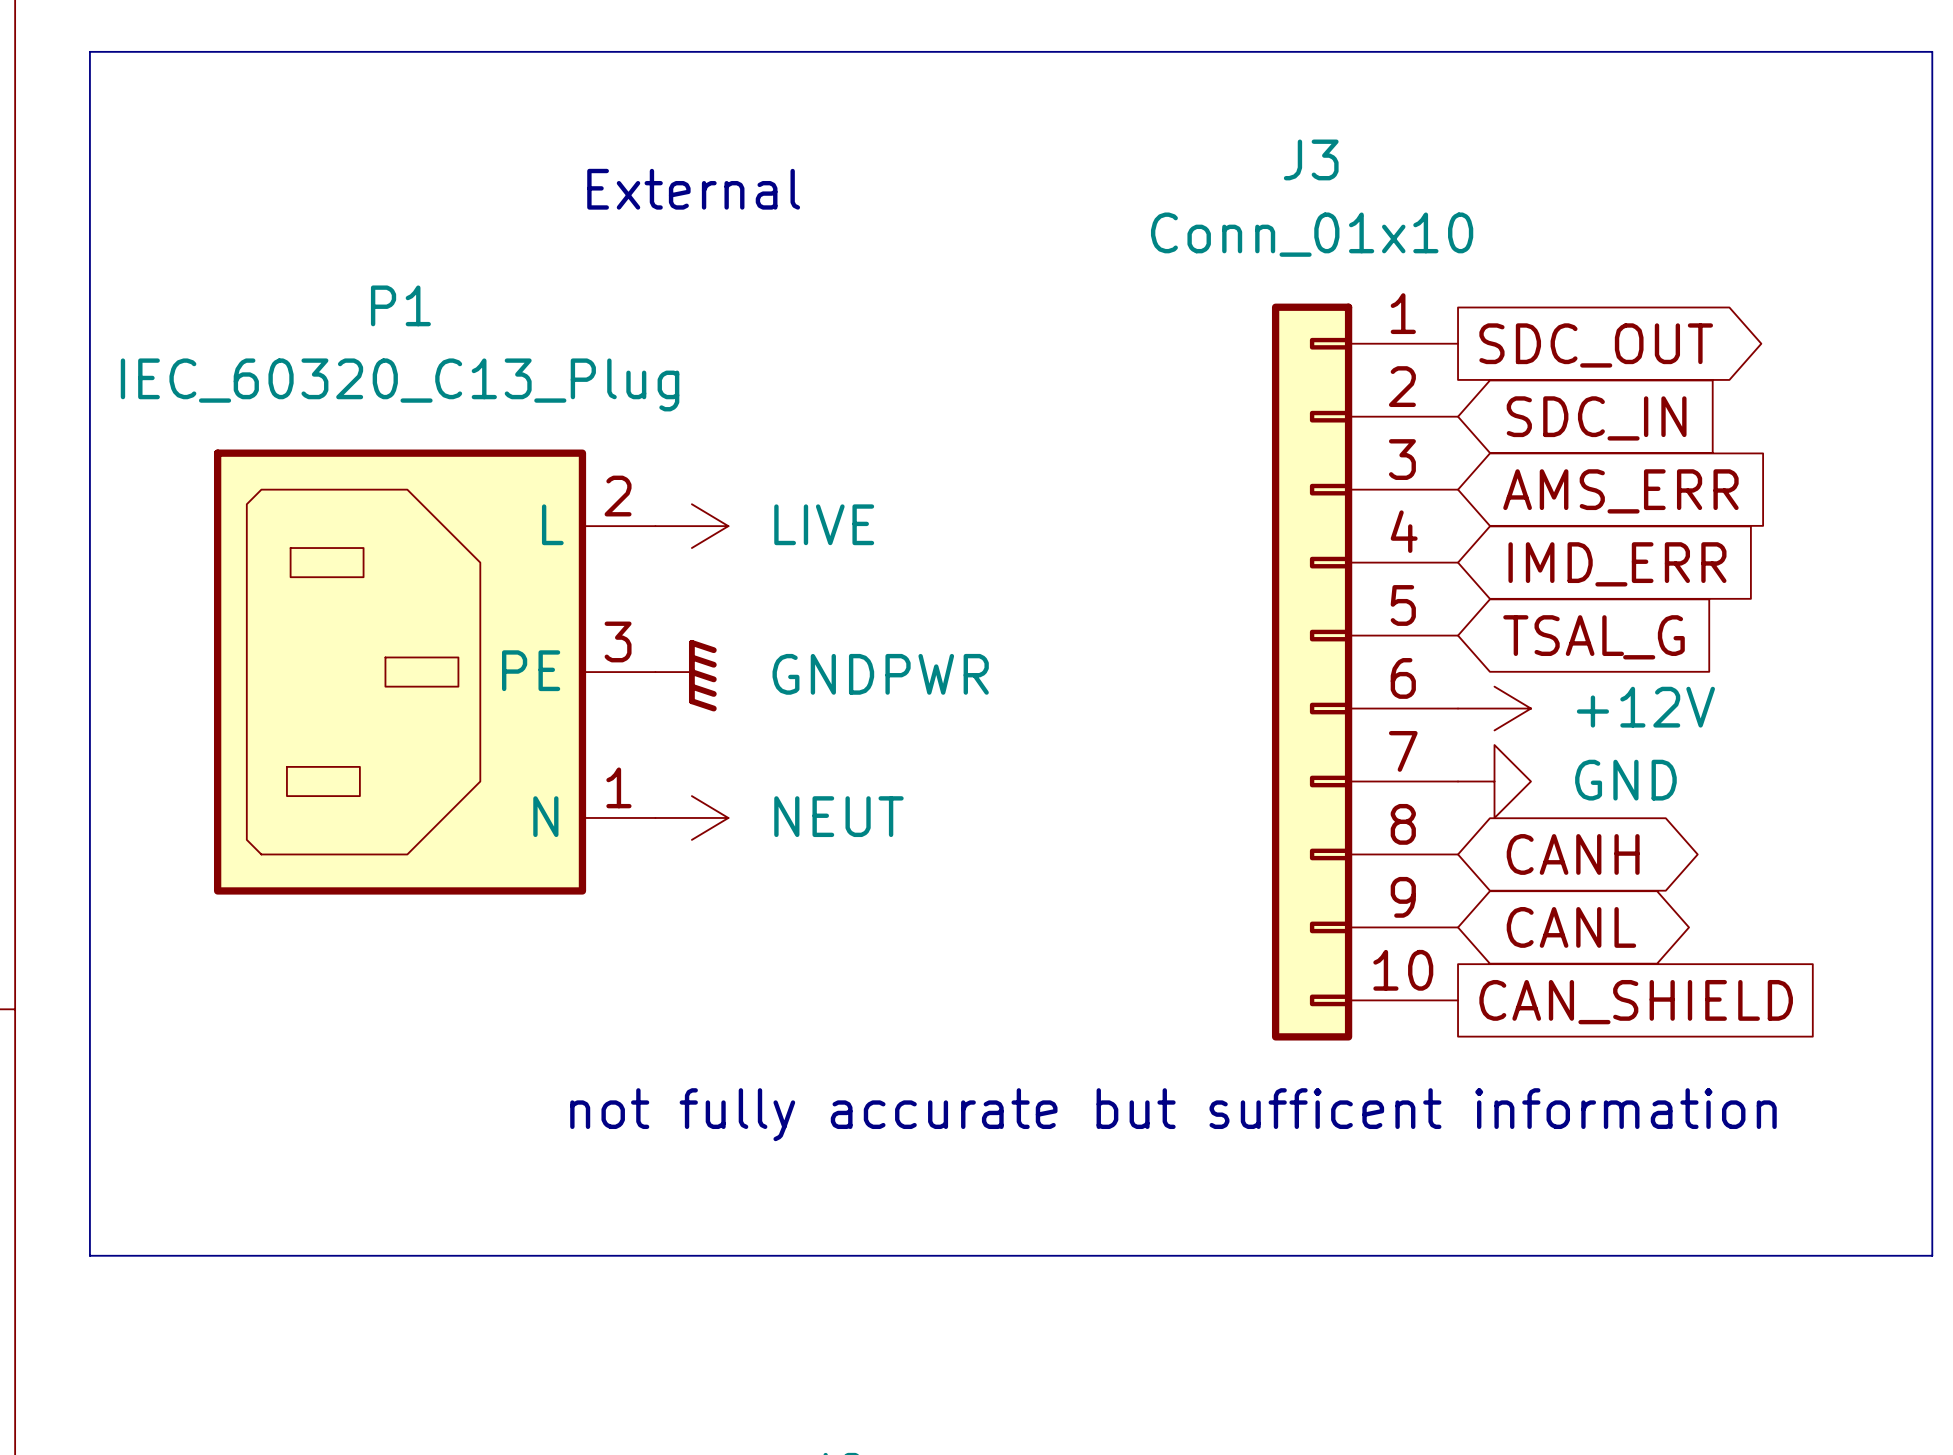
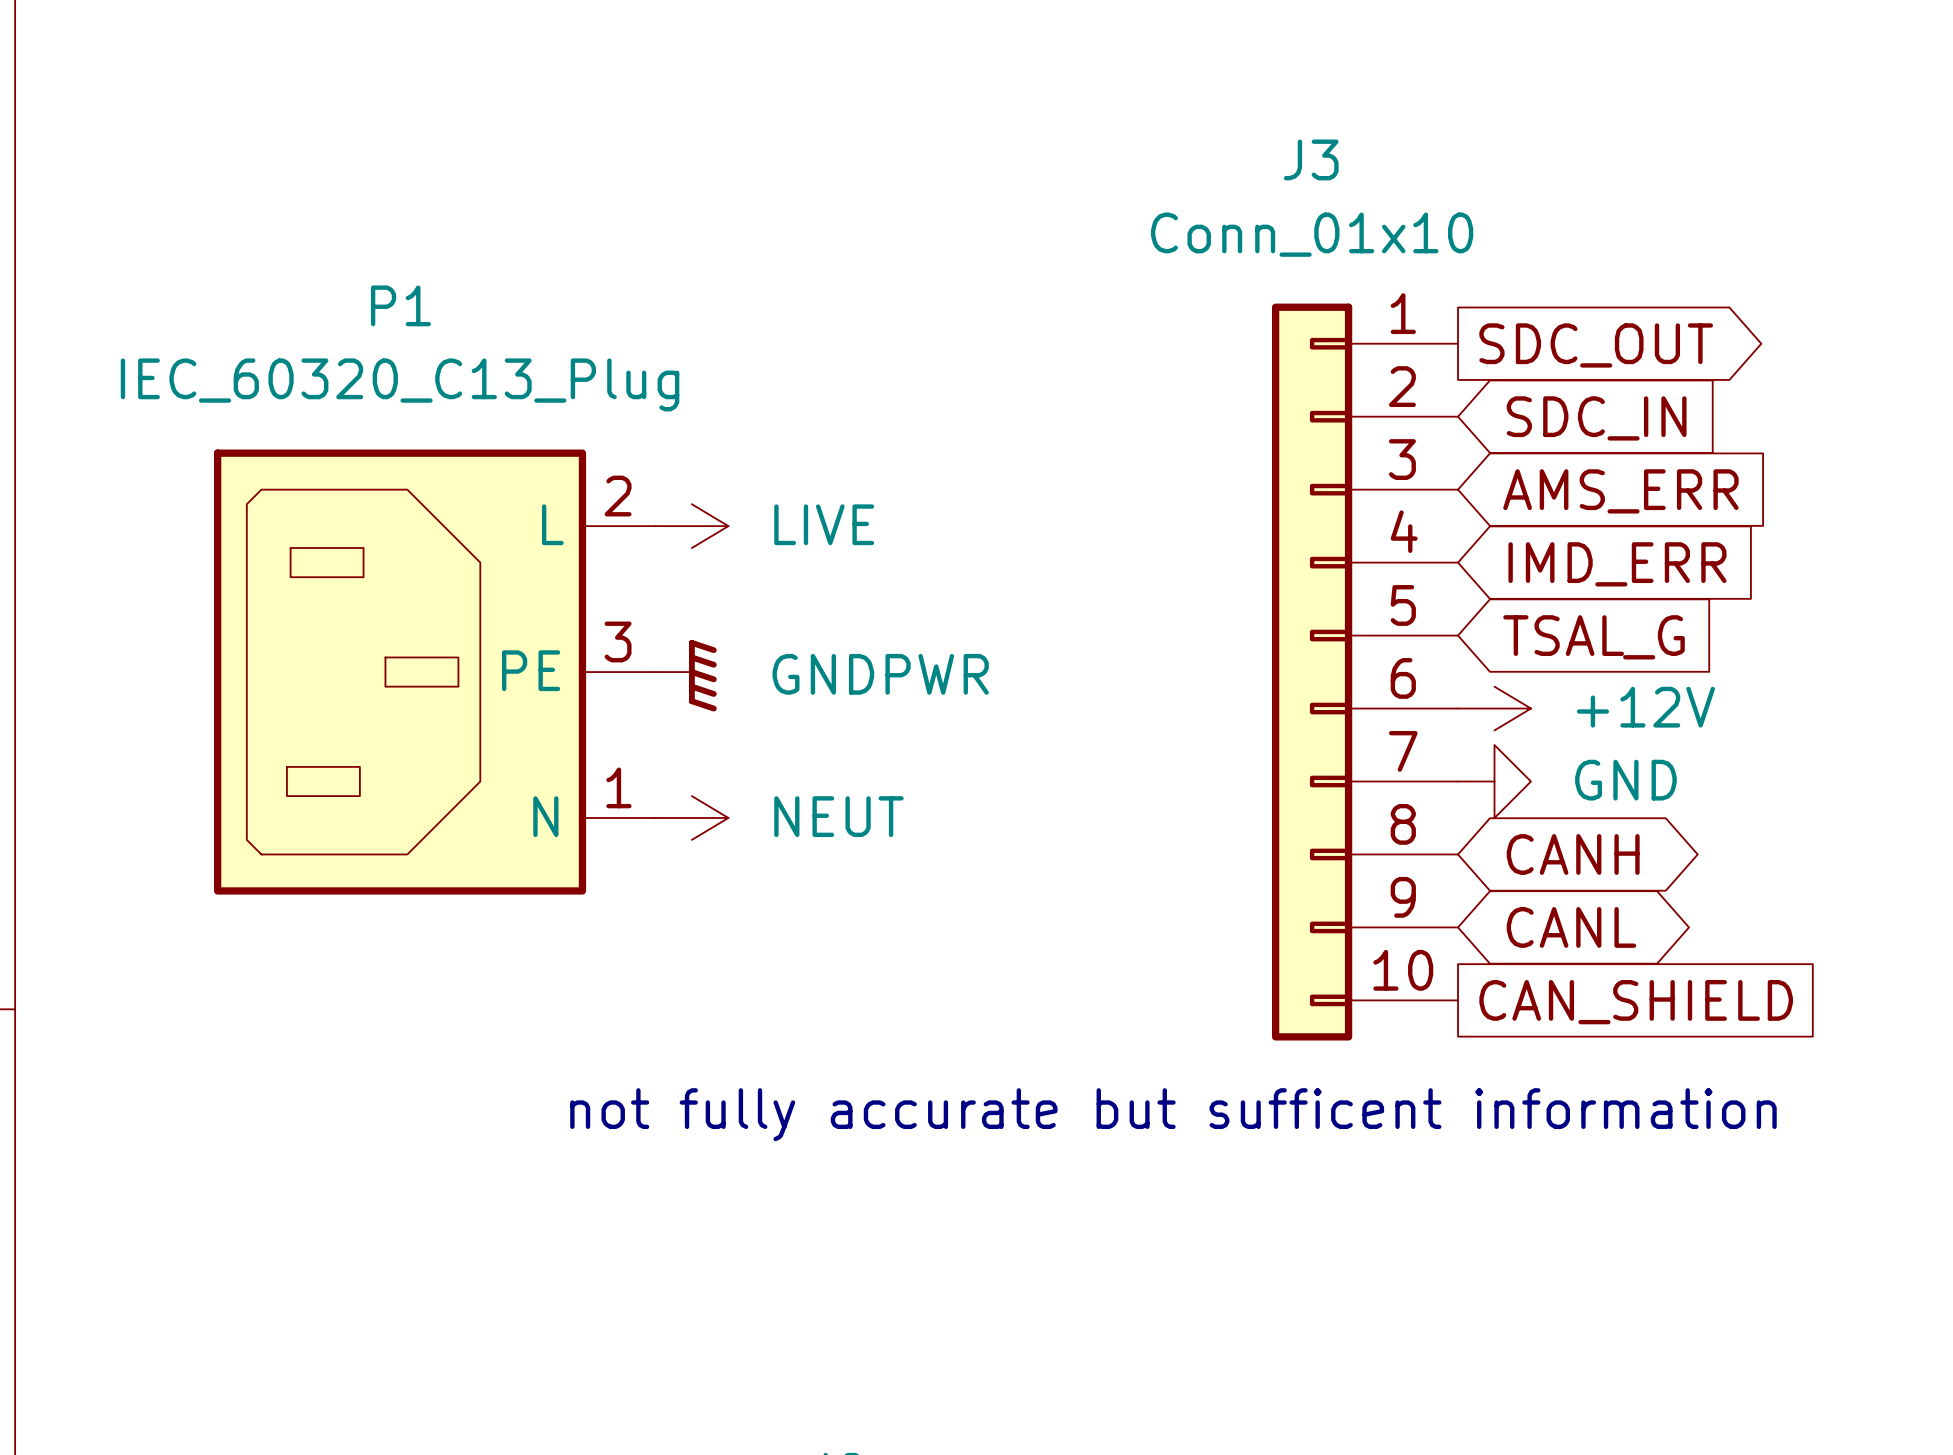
line: (89, 51) (1932, 51) (1932, 1255) (89, 1255) (89, 51) -> none
text: External (693, 189) -> none

